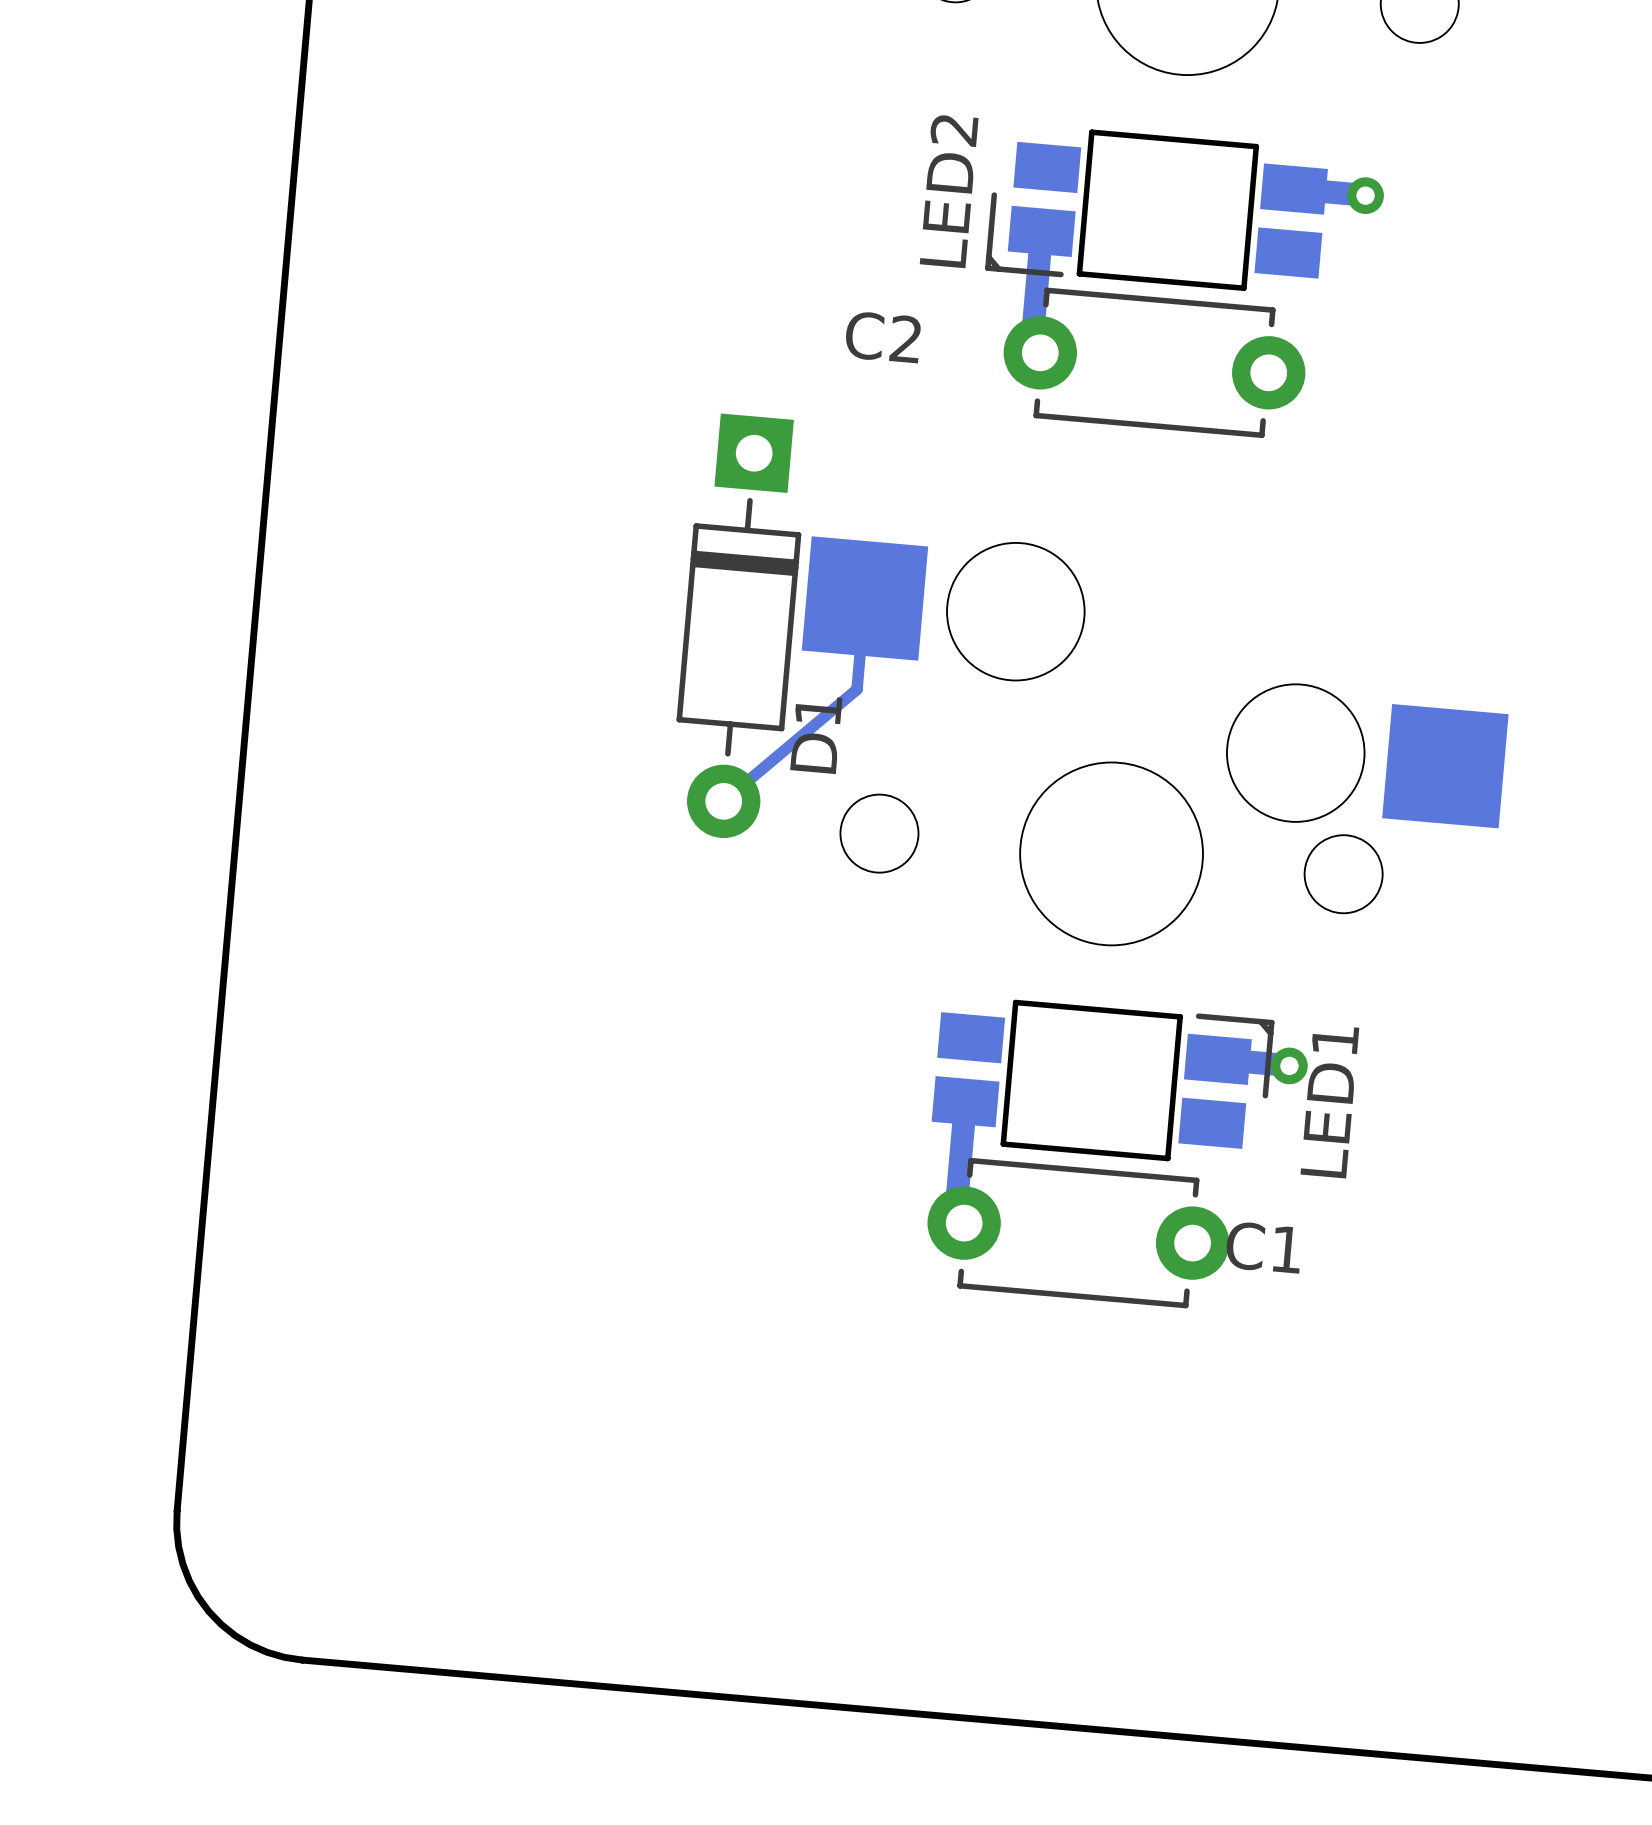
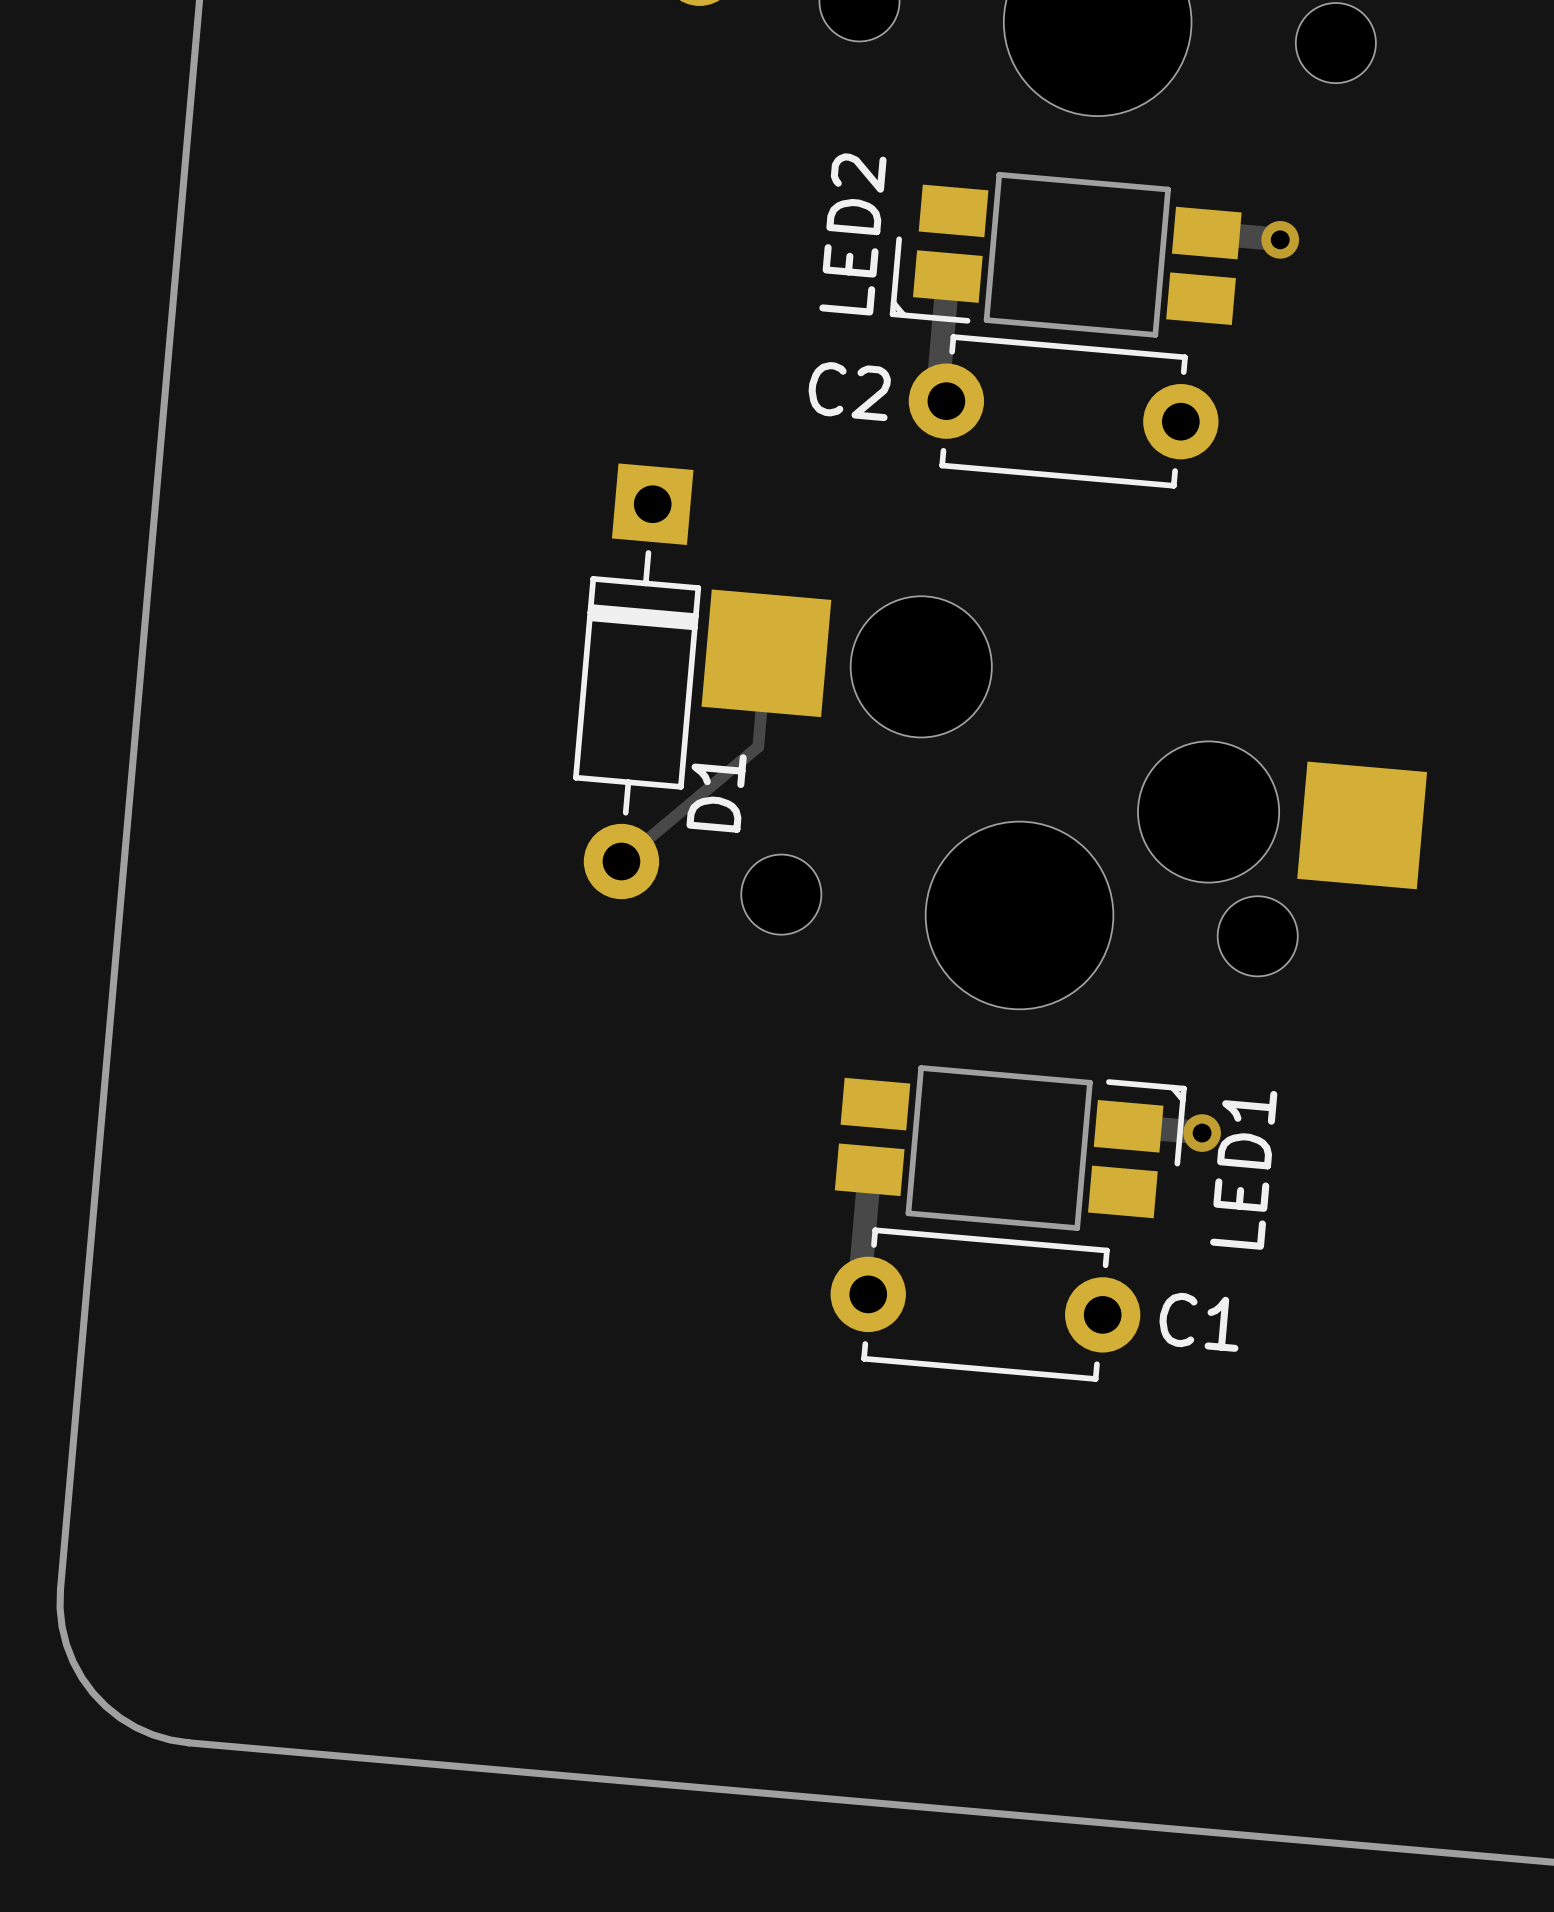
C2 name position: C2 (883, 337) -> C2 (849, 391)
C1 name position: C1 (1262, 1247) -> C1 (1198, 1322)

